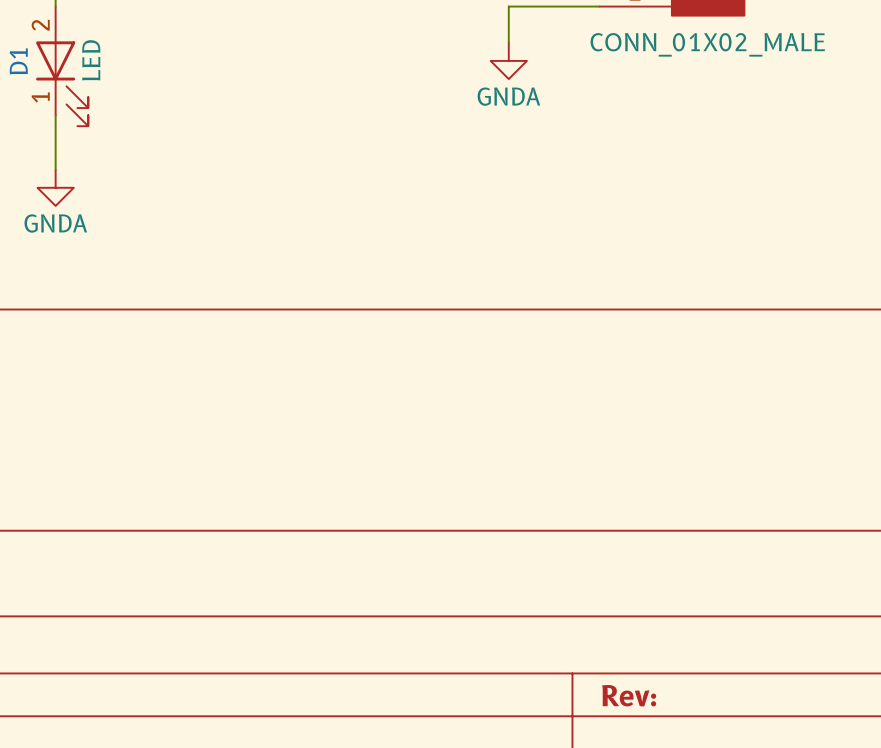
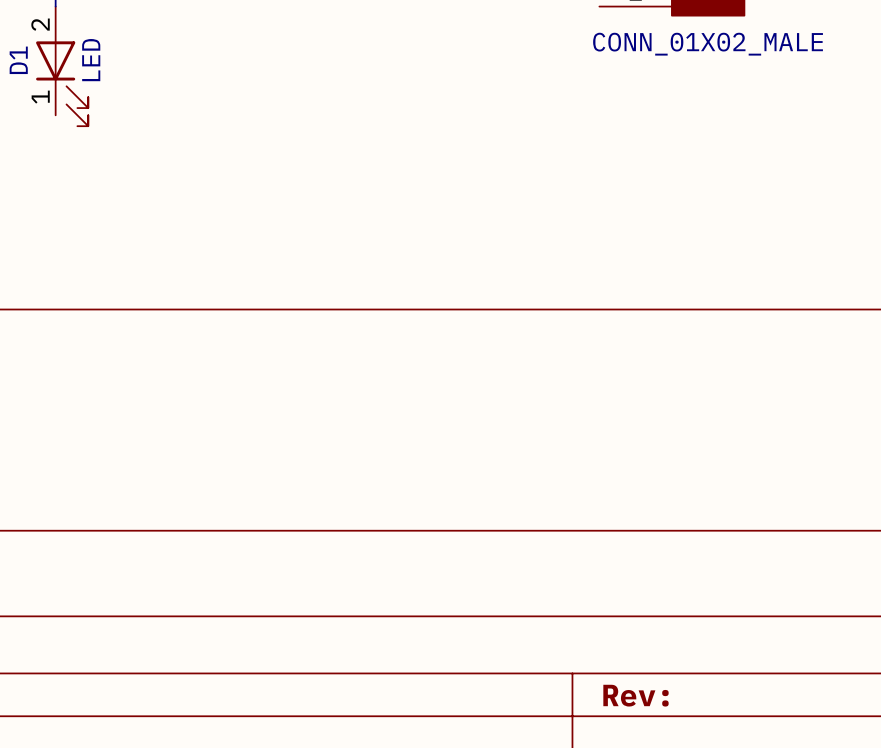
wire: (599, 6) (508, 6) (508, 42) -> none
power symbol: GNDA (508, 60) -> none
wire: (55, 115) (55, 169) -> none
power symbol: GNDA (55, 187) -> none

